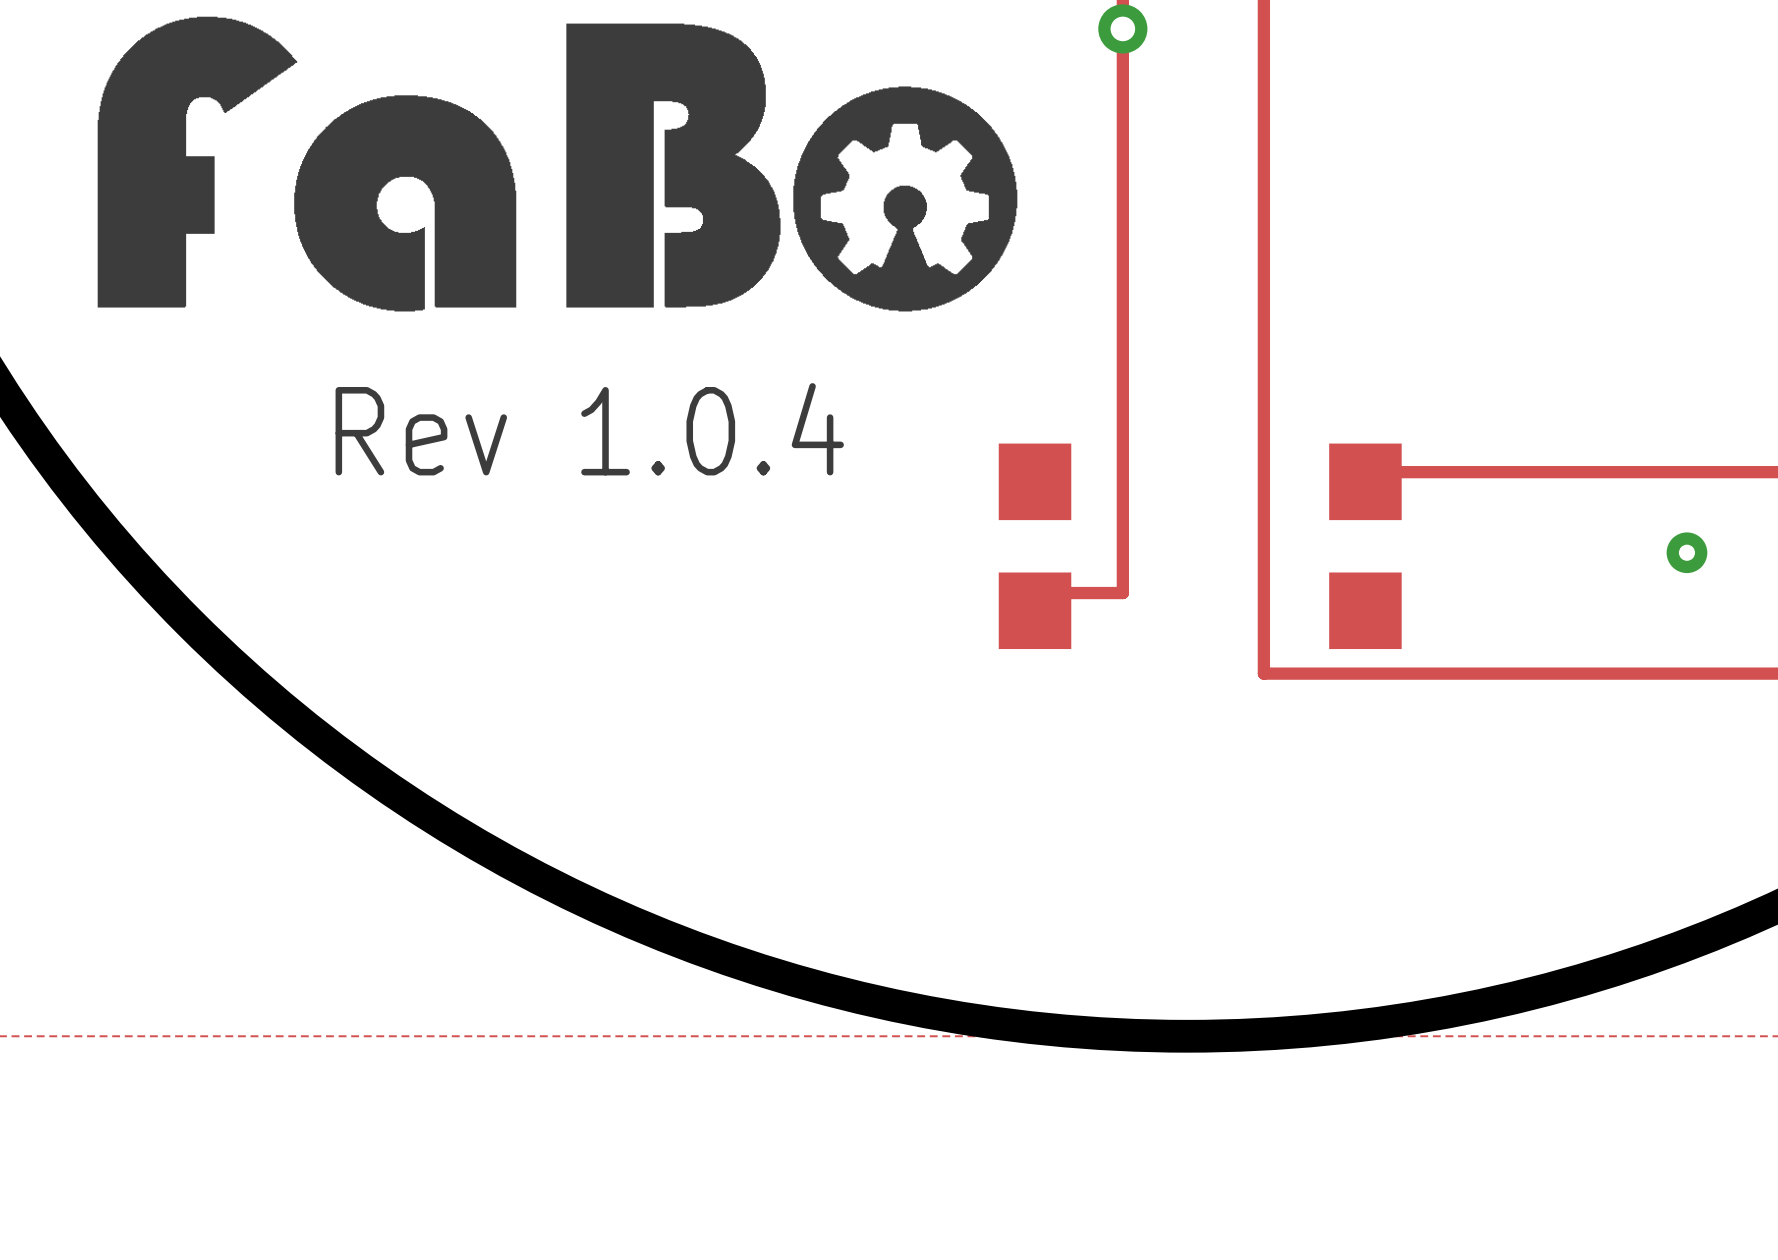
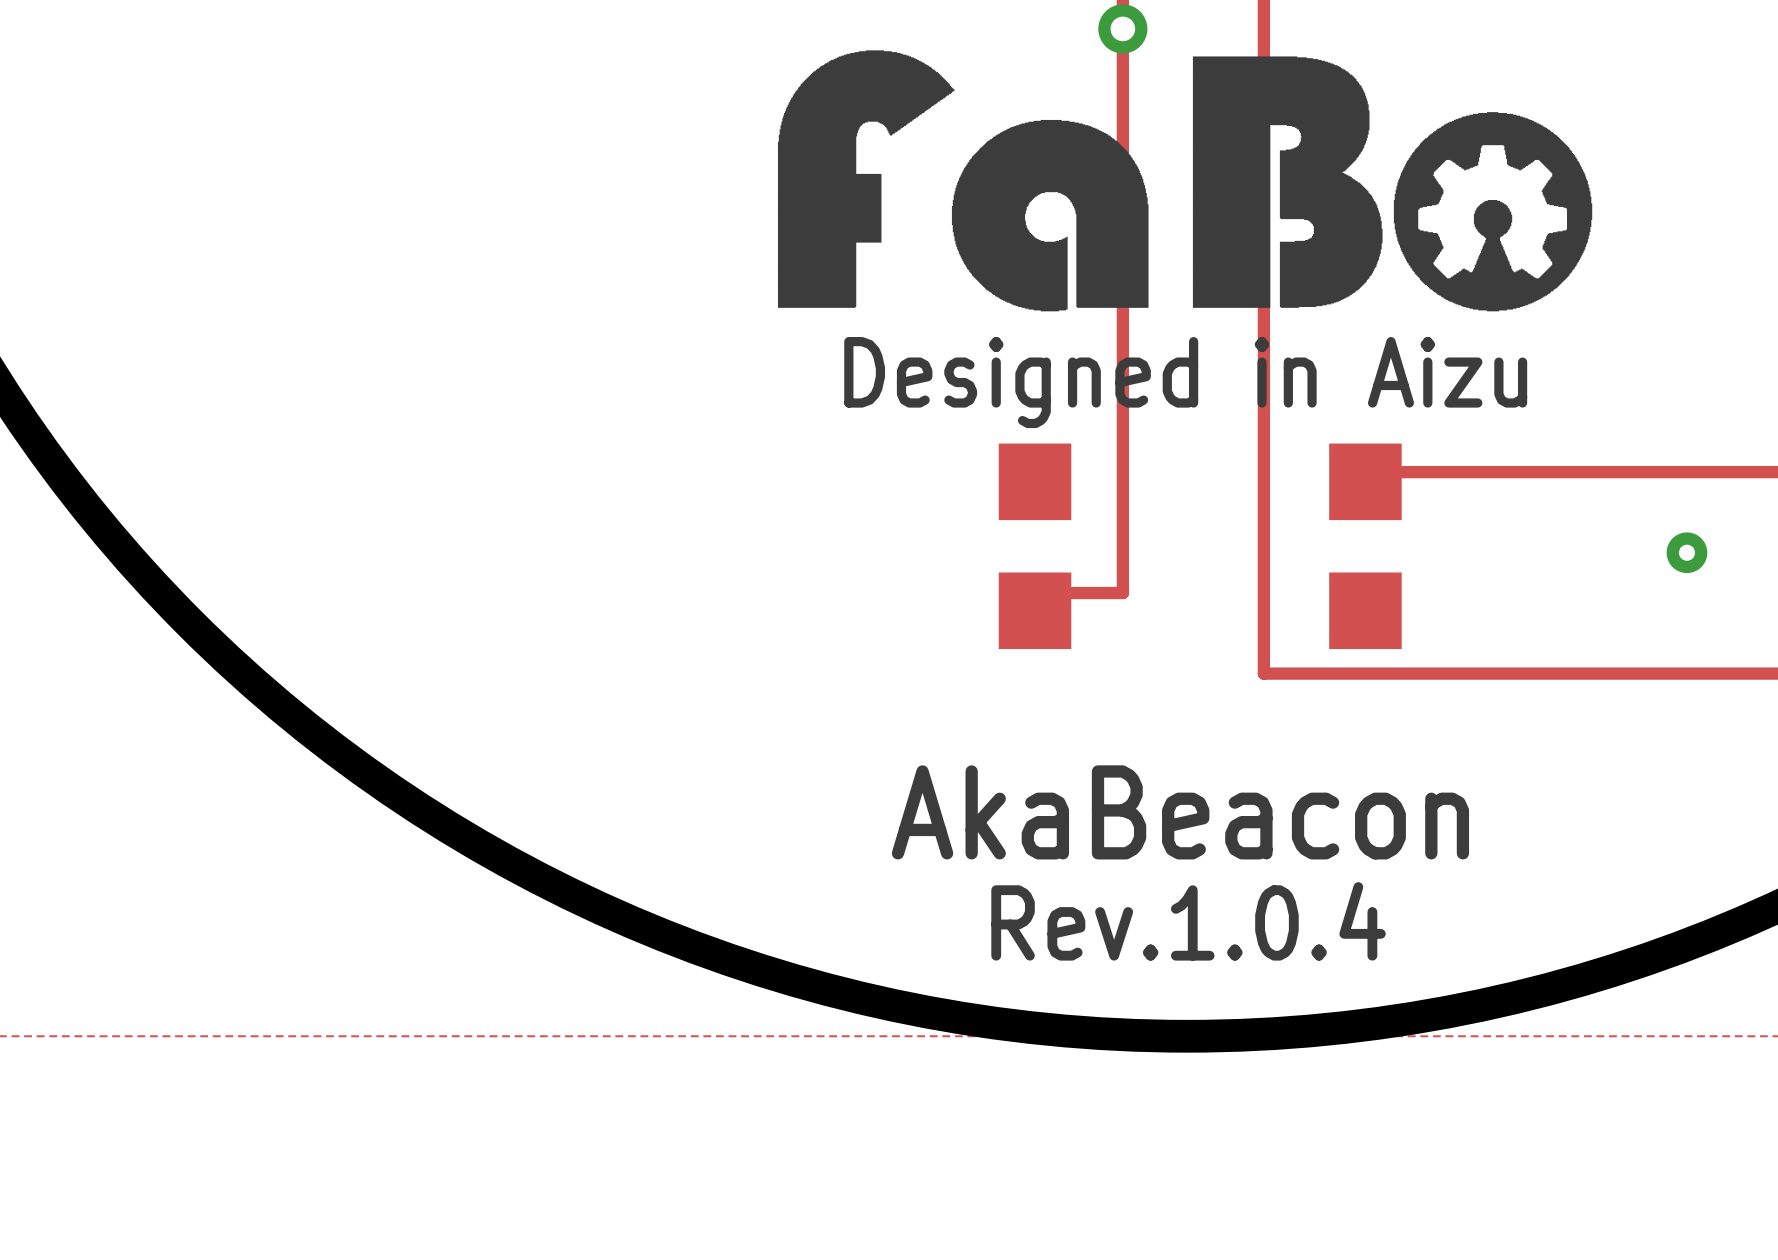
drawing: [97, 16, 1018, 312] -> none
drawing: none -> [777, 50, 1593, 312]
text: none -> Designed in Aizu (1185, 382)
text: Rev 1.0.4 (589, 429) -> none
text: none -> AkaBeacon (1180, 812)
text: none -> Rev.1.0.4 (1188, 921)

